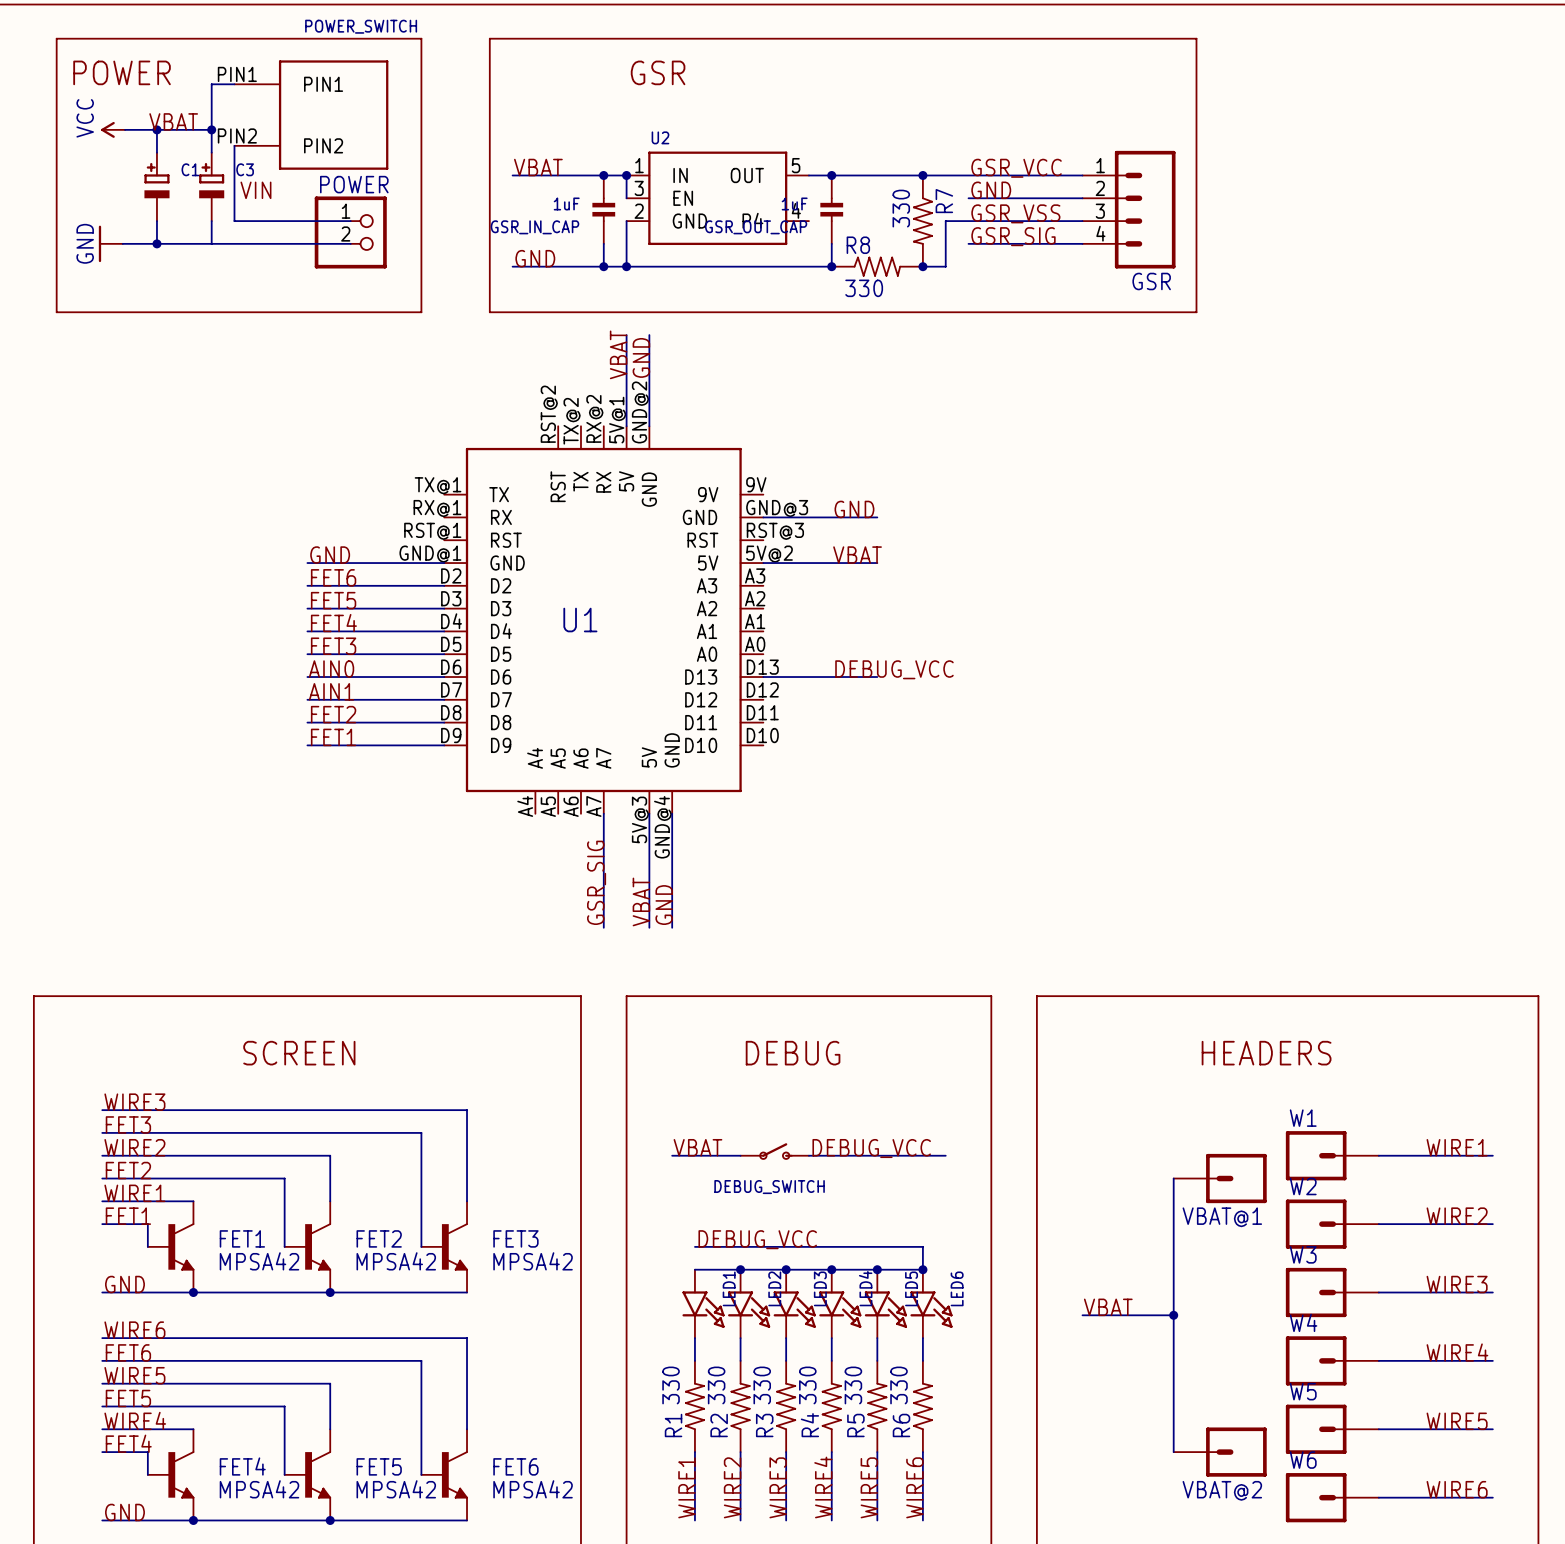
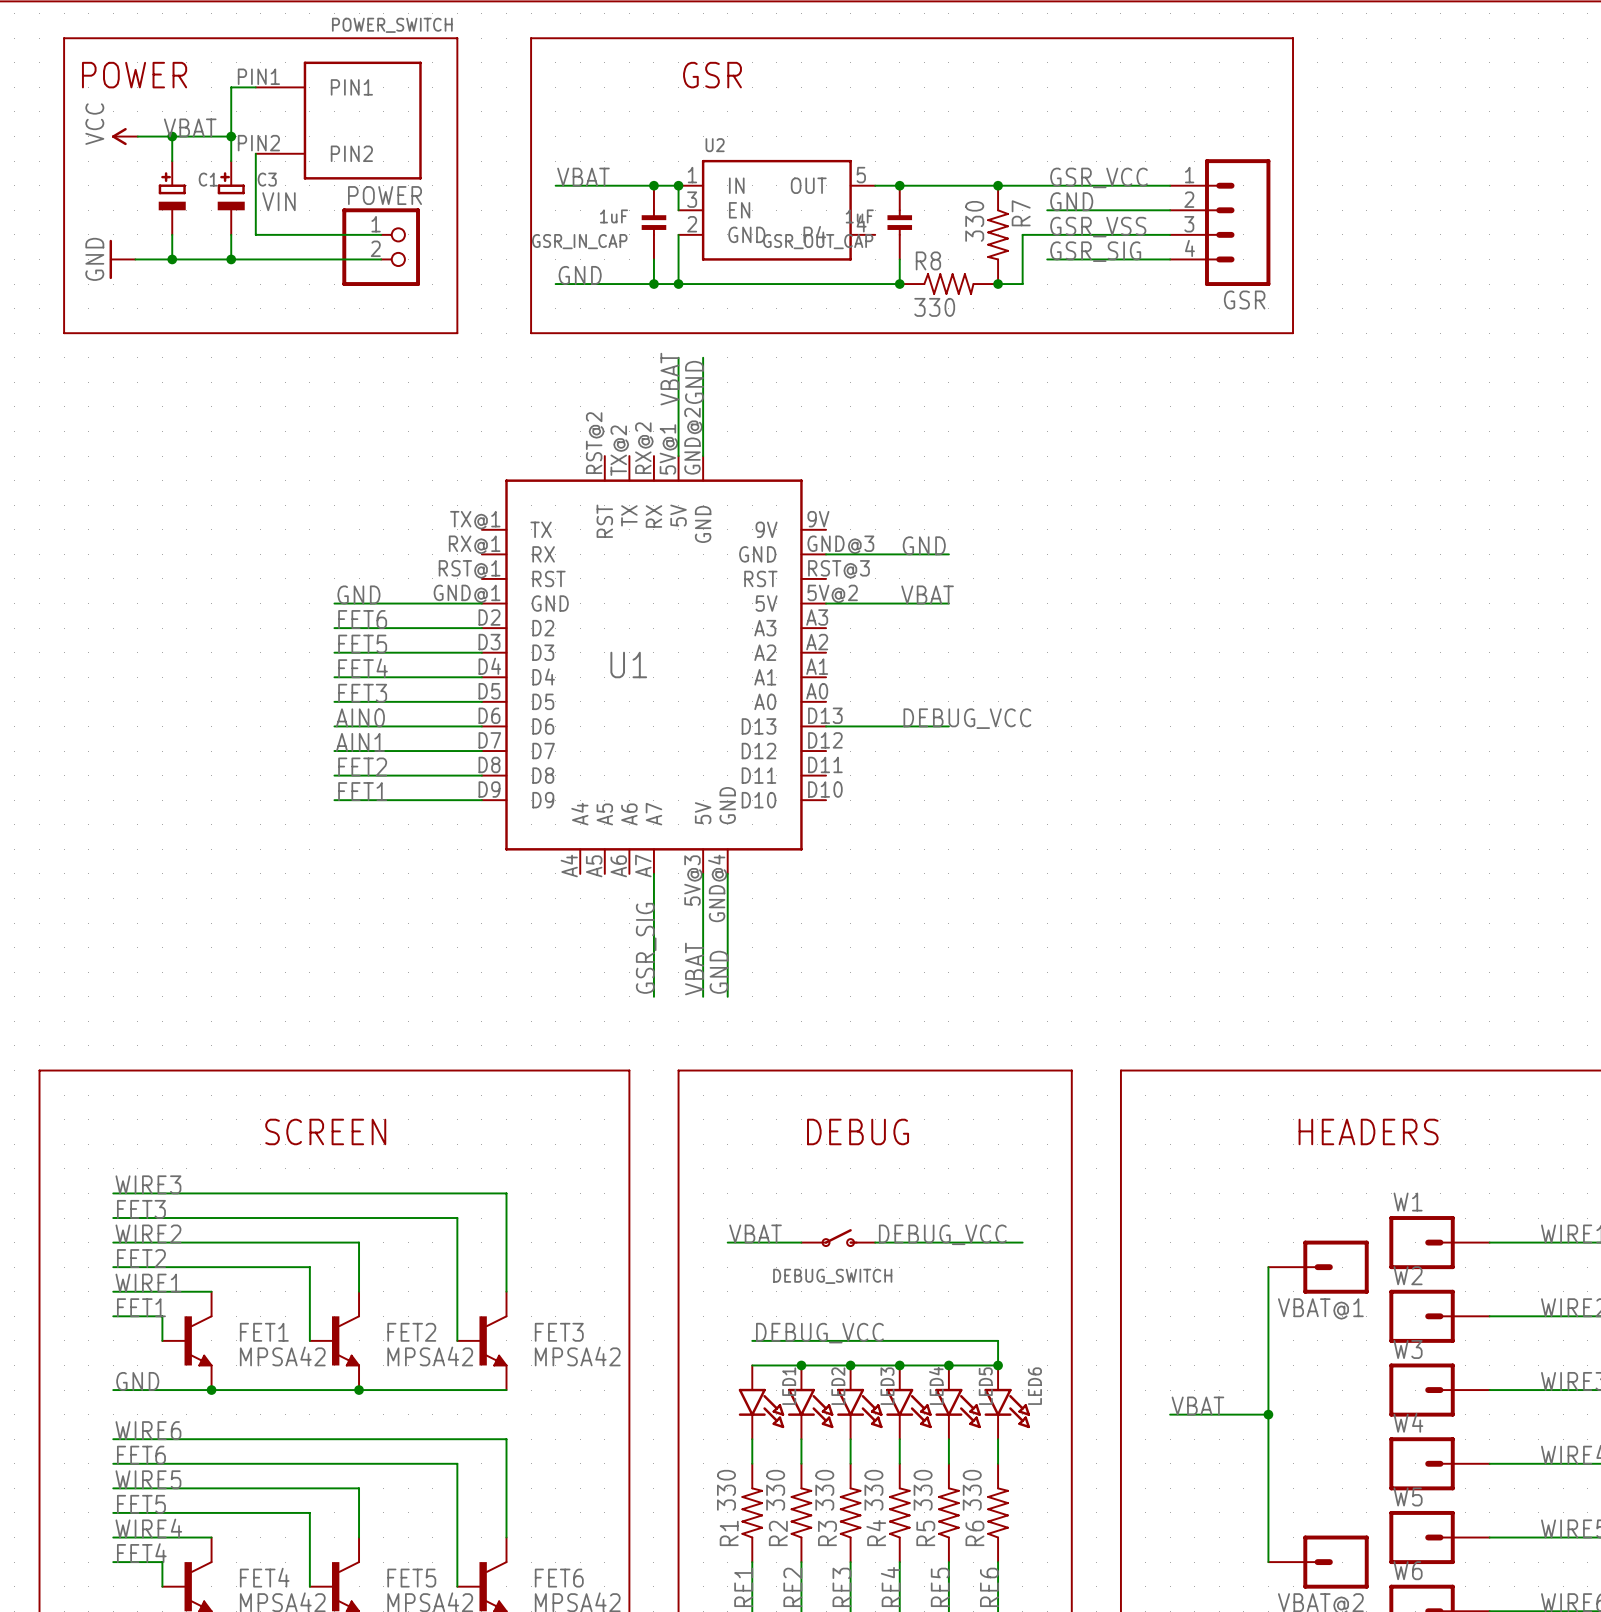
junction: none -> (231, 259)

